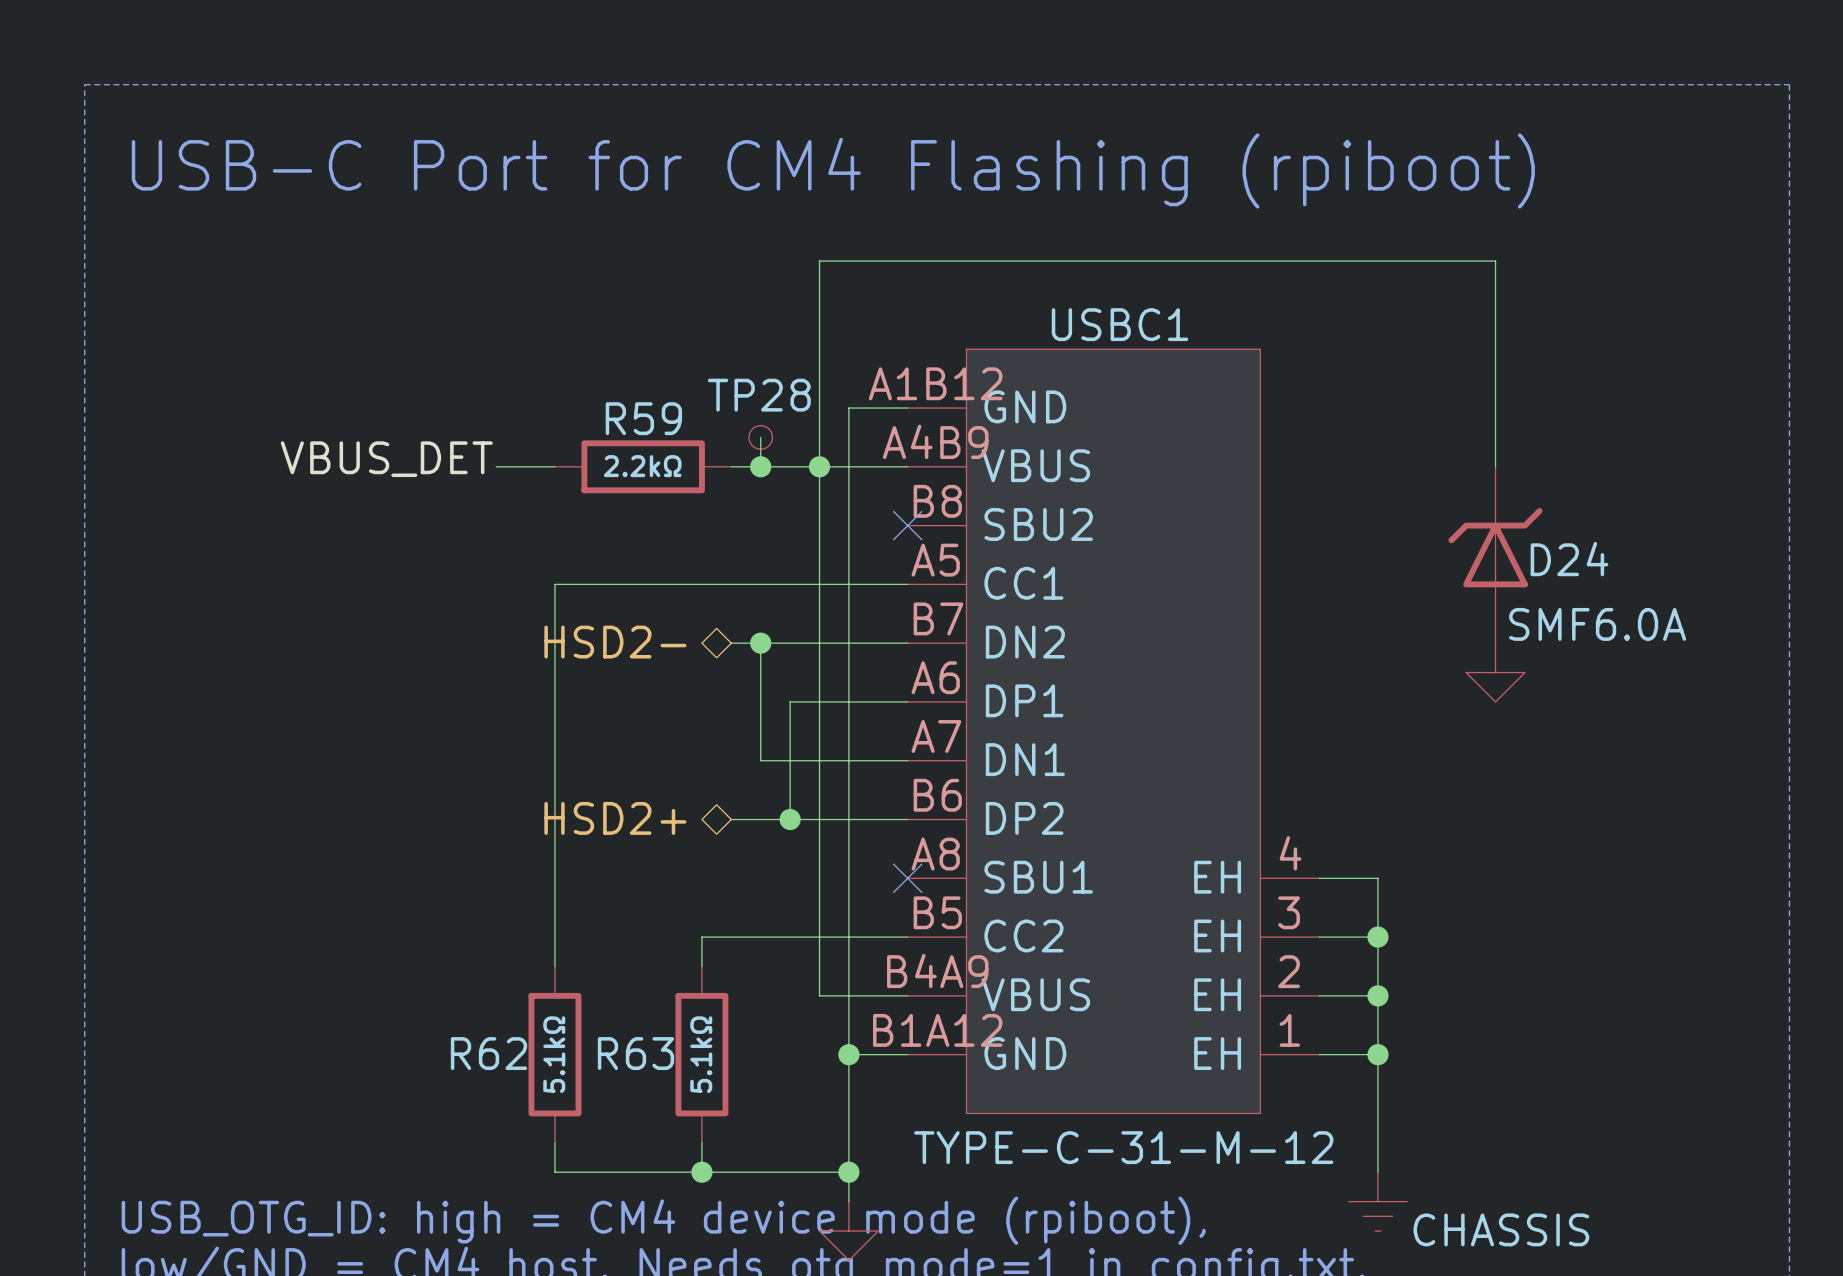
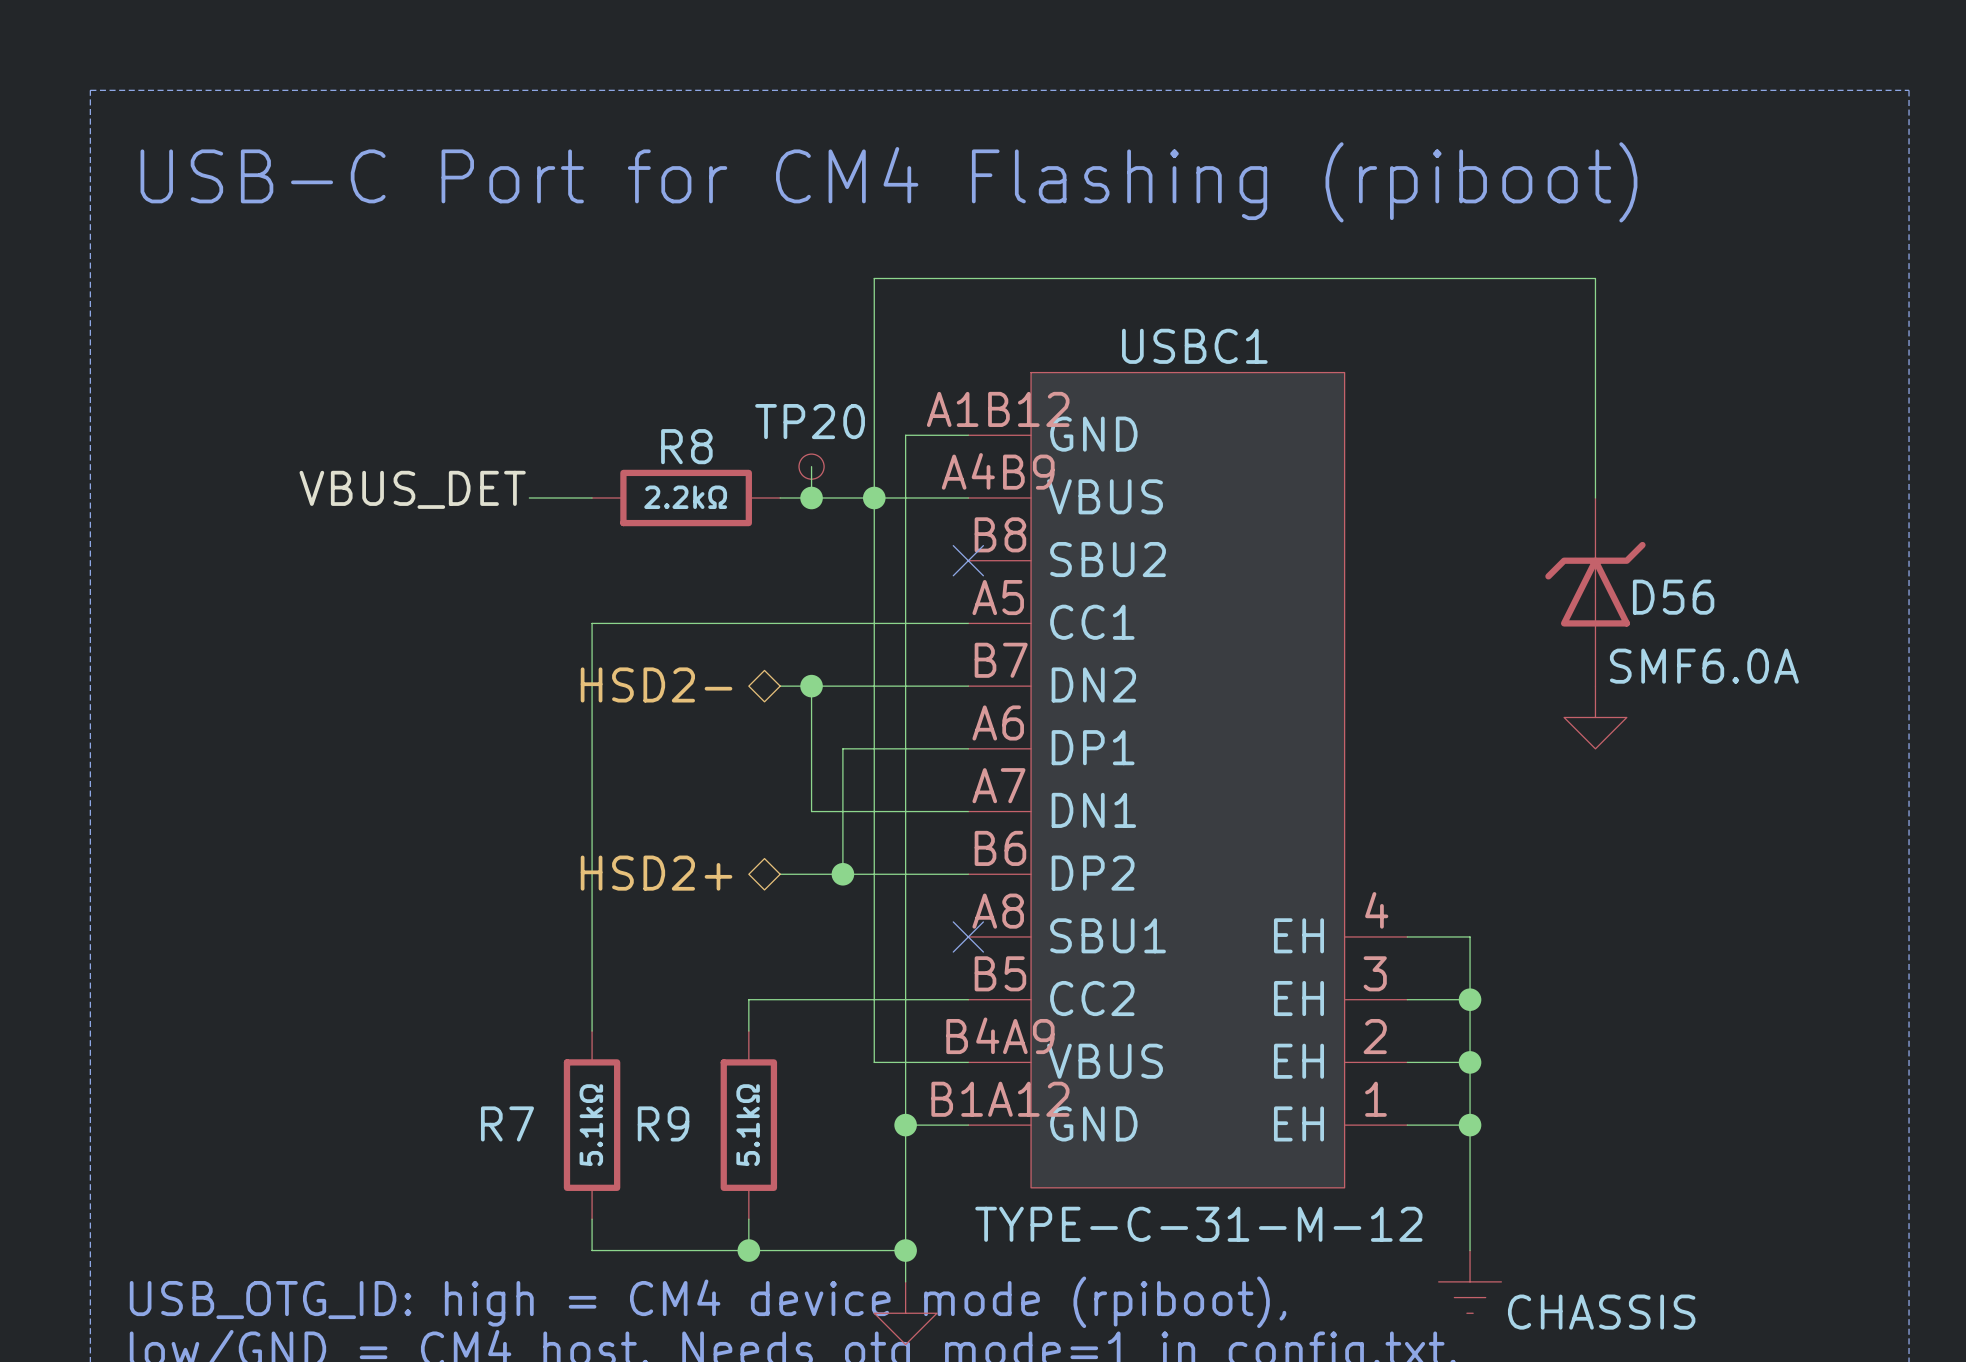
TP28 name: TP28 (759, 395) -> TP20 (810, 421)
R59 name: R59 (643, 418) -> R8 (686, 446)
D24 name: D24 (1569, 559) -> D56 (1673, 597)
R62 name: R62 (489, 1053) -> R7 (507, 1123)
R63 name: R63 (635, 1053) -> R9 (663, 1123)

